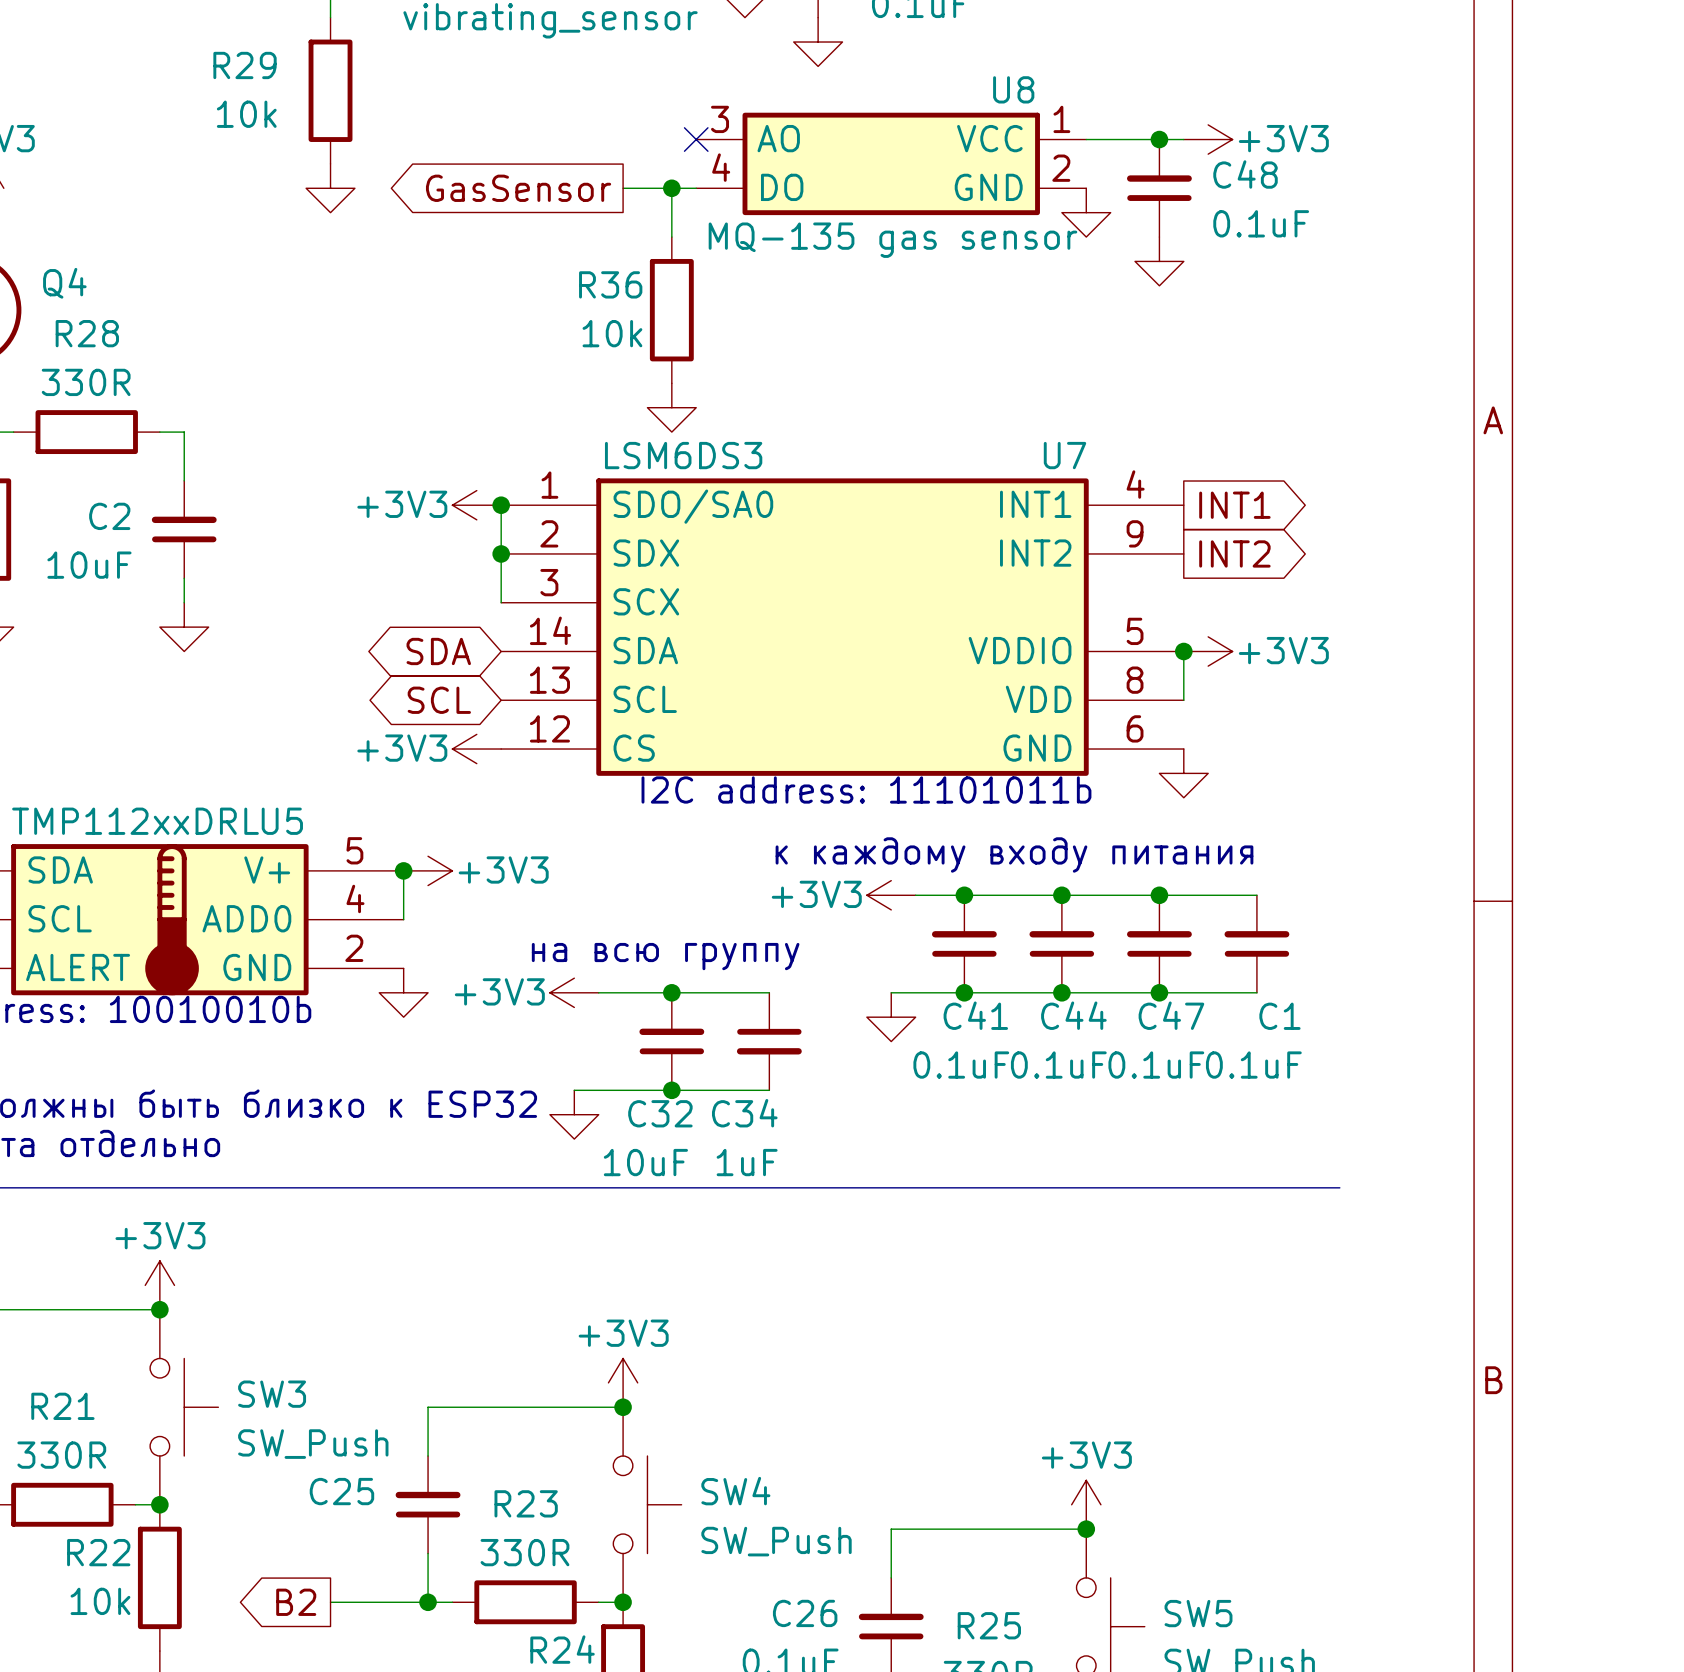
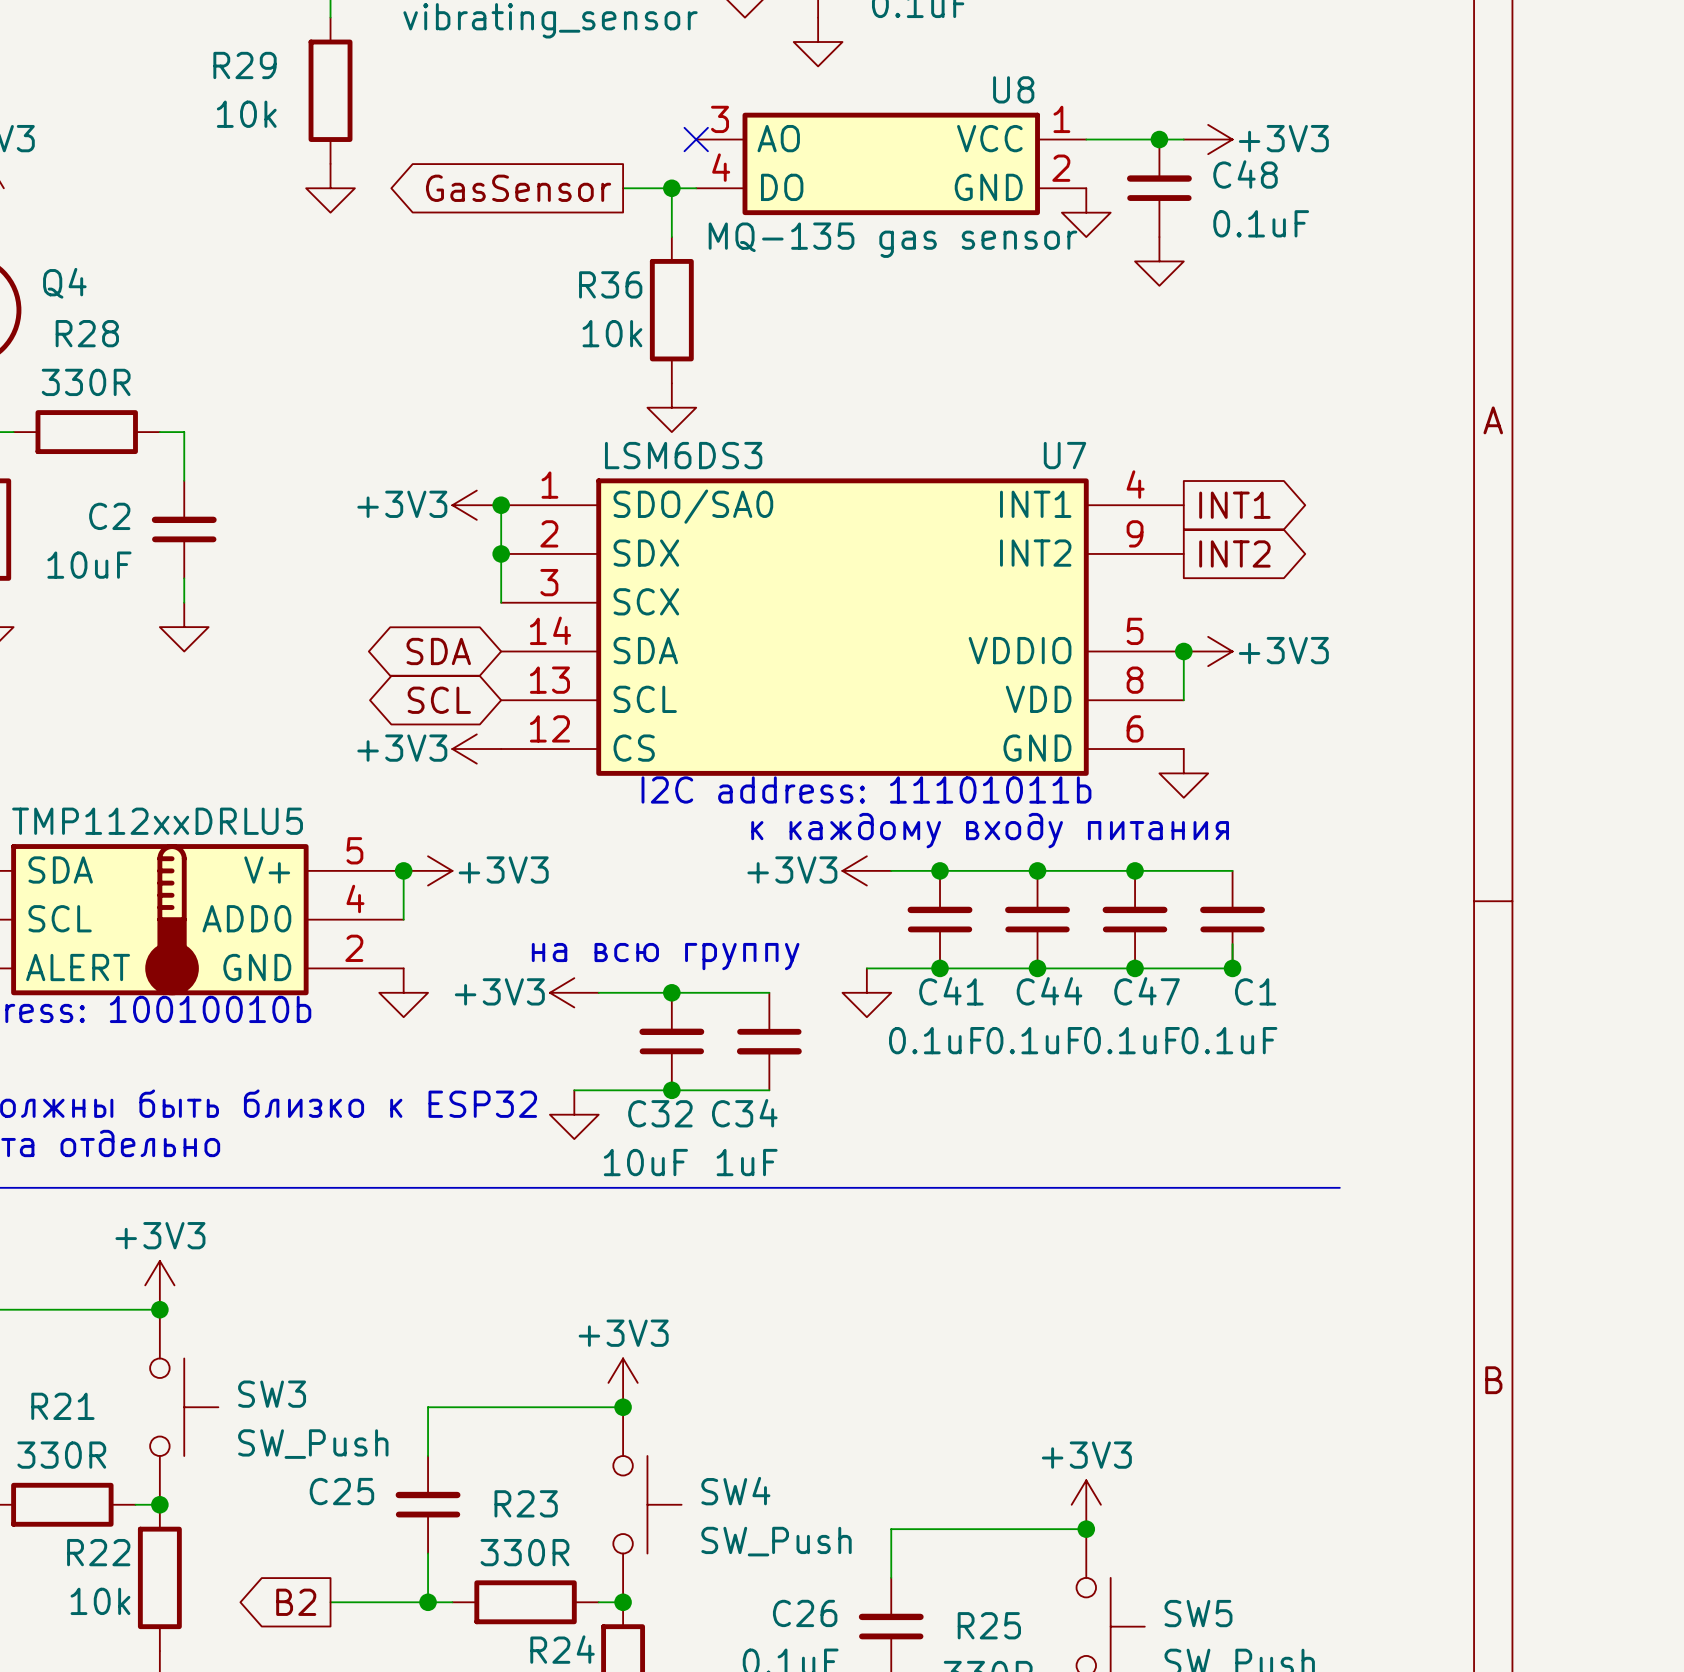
text position: к каждому входу питания (1014, 855) -> к каждому входу питания (990, 830)
power symbol position: +3V3 (891, 895) -> +3V3 (866, 870)
wire: (915, 895) (1256, 895) -> (891, 870) (1232, 870)
junction position: (964, 895) -> (940, 870)
junction position: (1061, 895) -> (1037, 870)
junction position: (1159, 895) -> (1135, 870)
C41 position: (964, 944) -> (940, 919)
C44 position: (1061, 944) -> (1037, 919)
C47 position: (1159, 944) -> (1135, 919)
wire: none -> (1232, 944) (1232, 968) (866, 968)
C1 position: (1256, 944) -> (1232, 919)
junction: none -> (1232, 968)
wire: (891, 992) (1256, 992) -> none
junction position: (964, 992) -> (940, 968)
junction position: (1061, 992) -> (1037, 968)
junction position: (1159, 992) -> (1135, 968)
power symbol position: (891, 1017) -> (866, 992)

